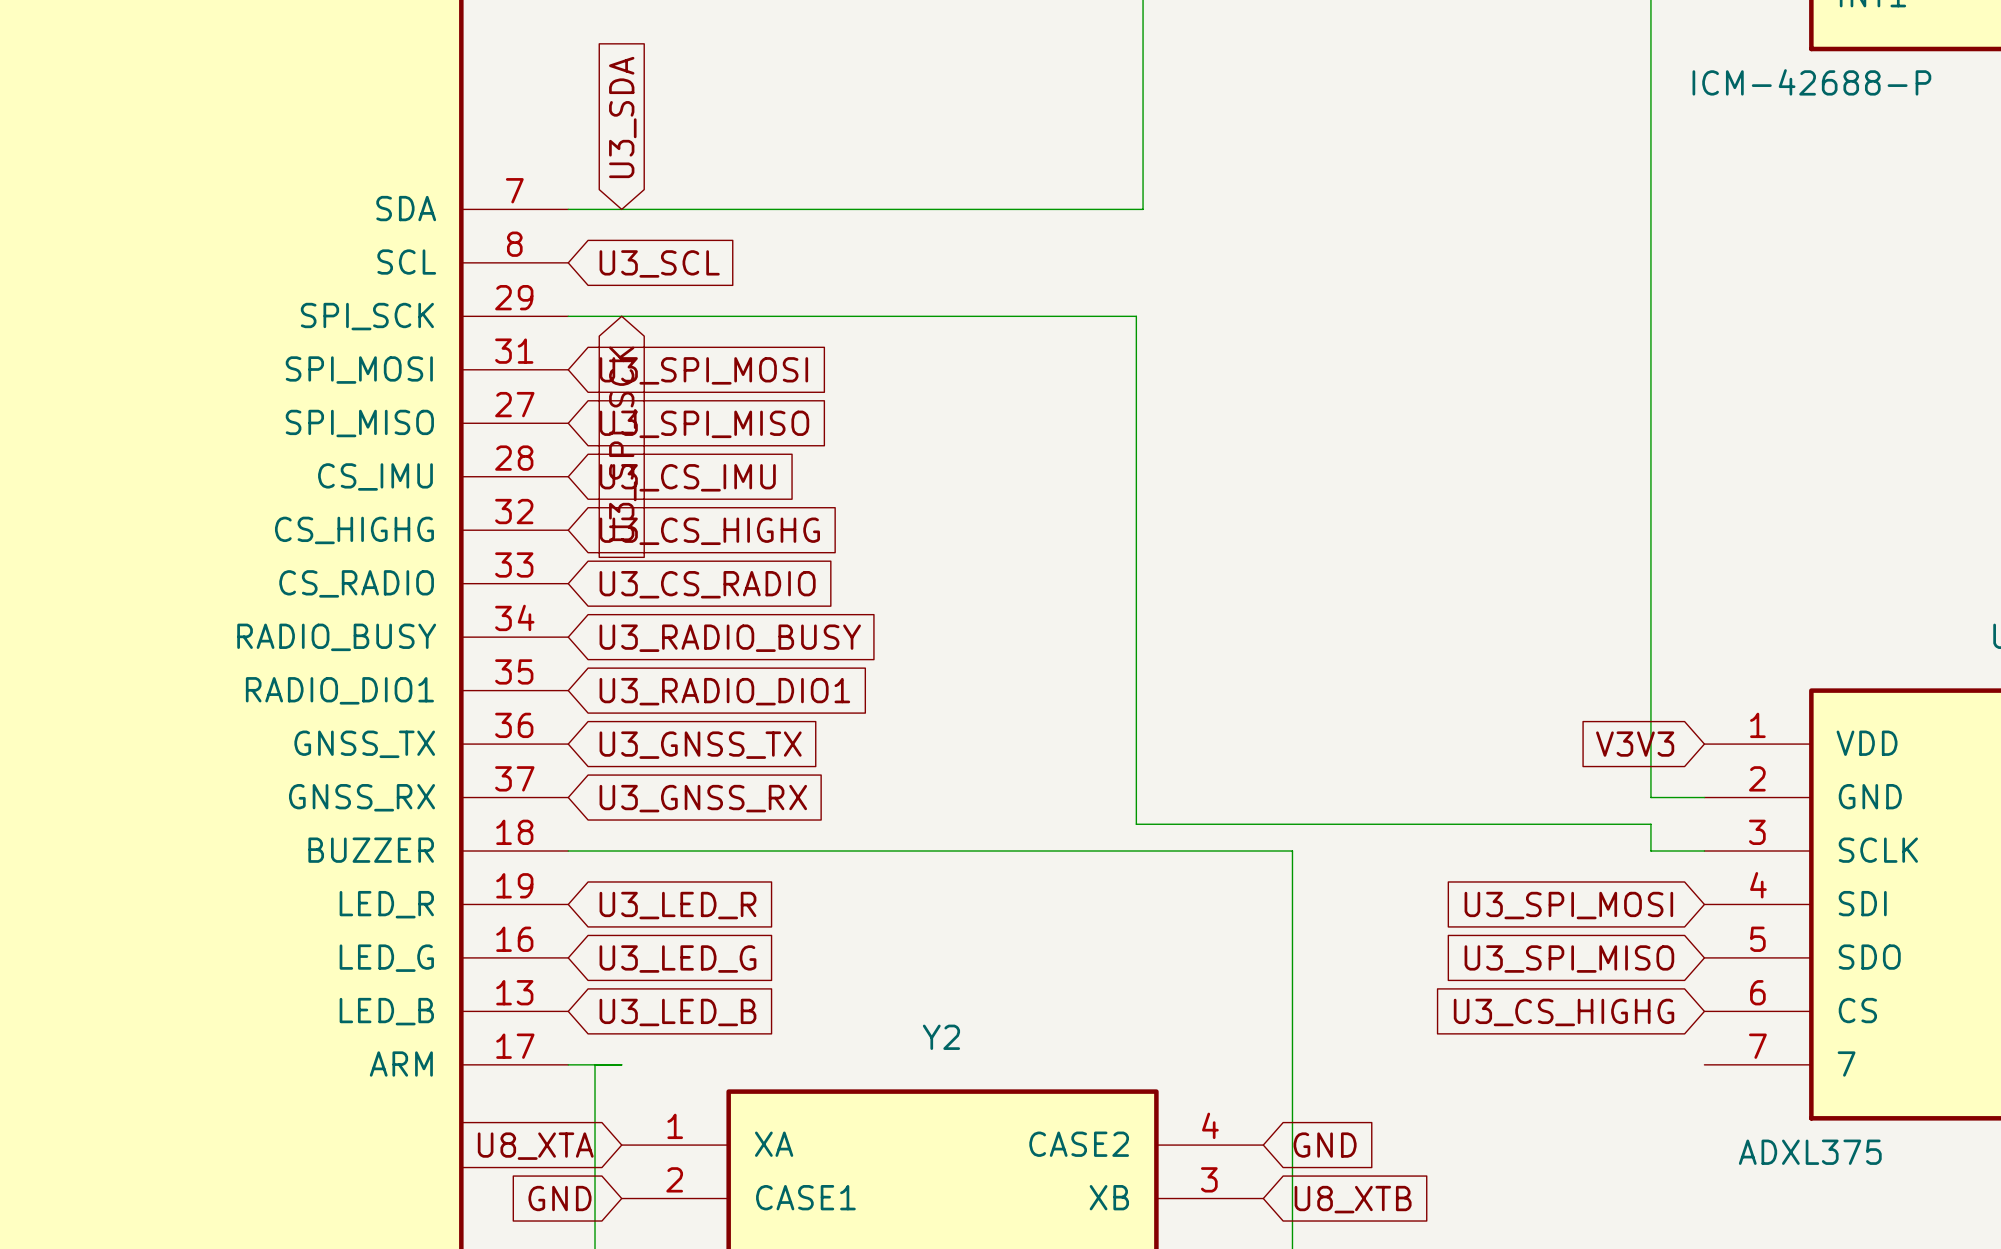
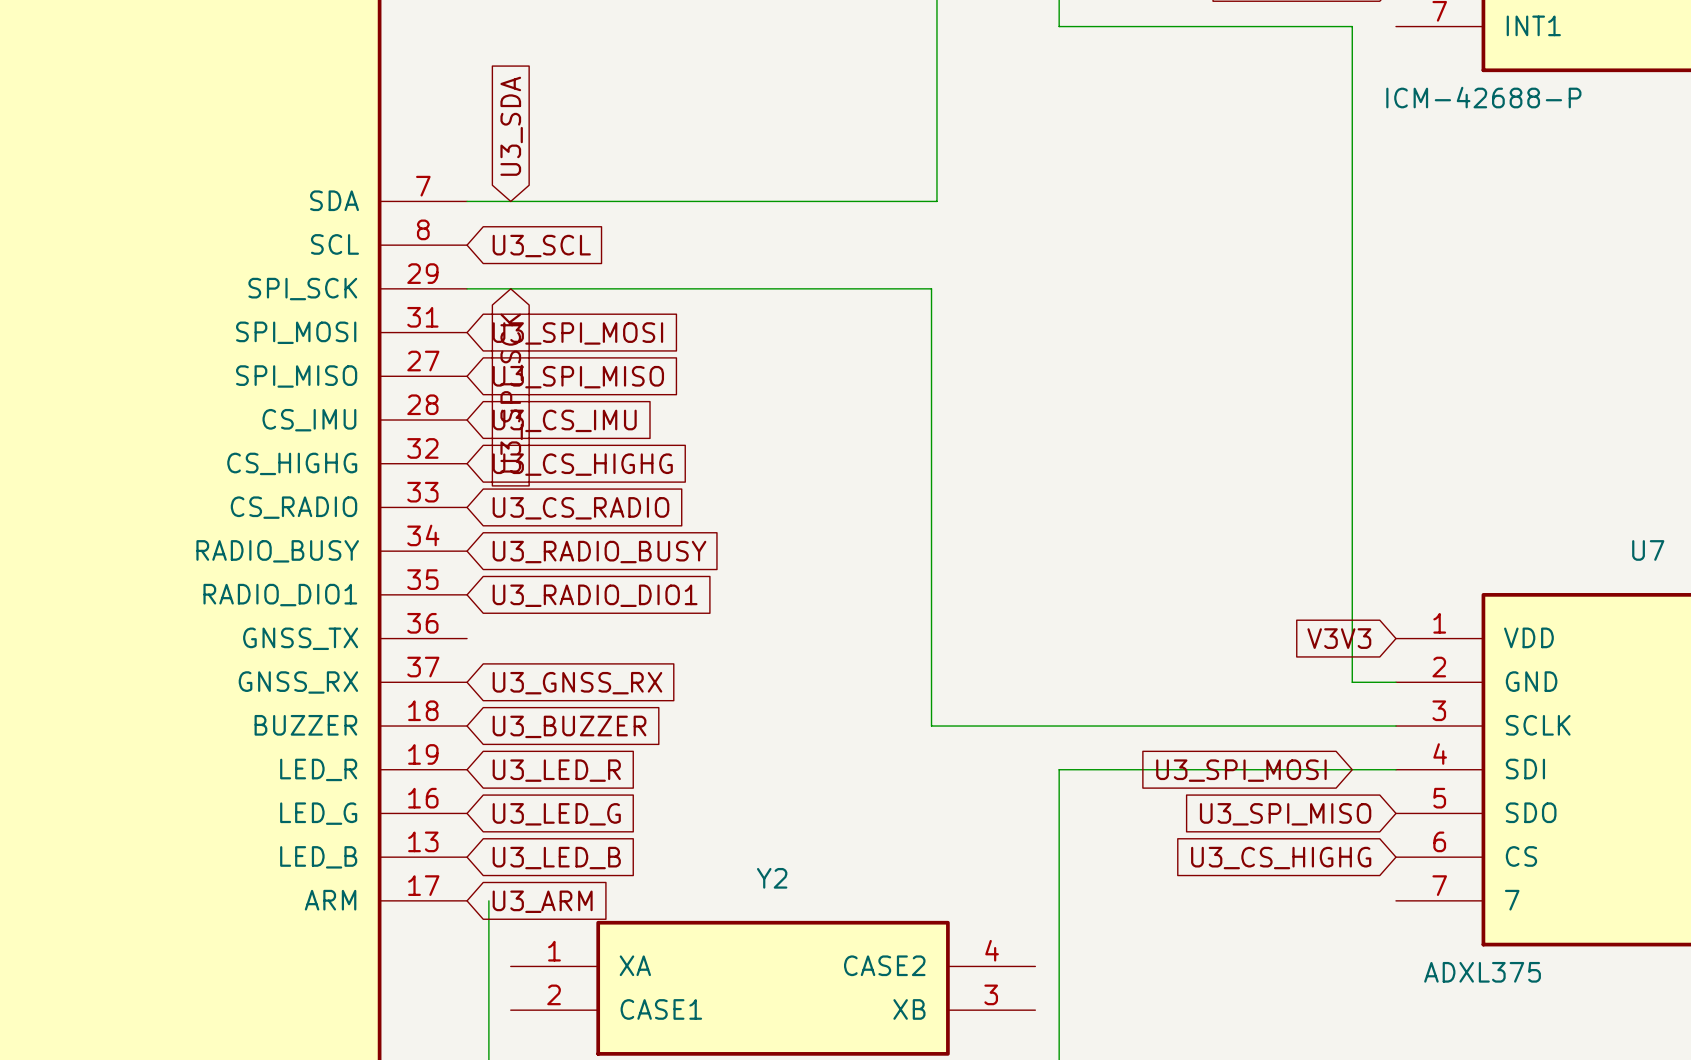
global label: U3_GNSS_TX (700, 745) -> none
wire: (1136, 824) (1650, 824) (1650, 851) -> (1059, 726) (1352, 726)
wire: (568, 851) (1136, 851) -> (931, 704) (931, 726)
wire: (1292, 851) (1292, 904) -> (1395, 769) (1059, 769)
global label: none -> U3_BUZZER (569, 726)
global label position: U3_SPI_MOSI (1568, 905) -> U3_SPI_MOSI (1241, 770)
wire: (568, 1064) (621, 1064) -> none
global label: none -> U3_ARM (542, 901)
global label: GND (1325, 1145) -> none
global label: U8_XTA (535, 1146) -> none
global label: GND (559, 1198) -> none
global label: U8_XTB (1353, 1199) -> none

